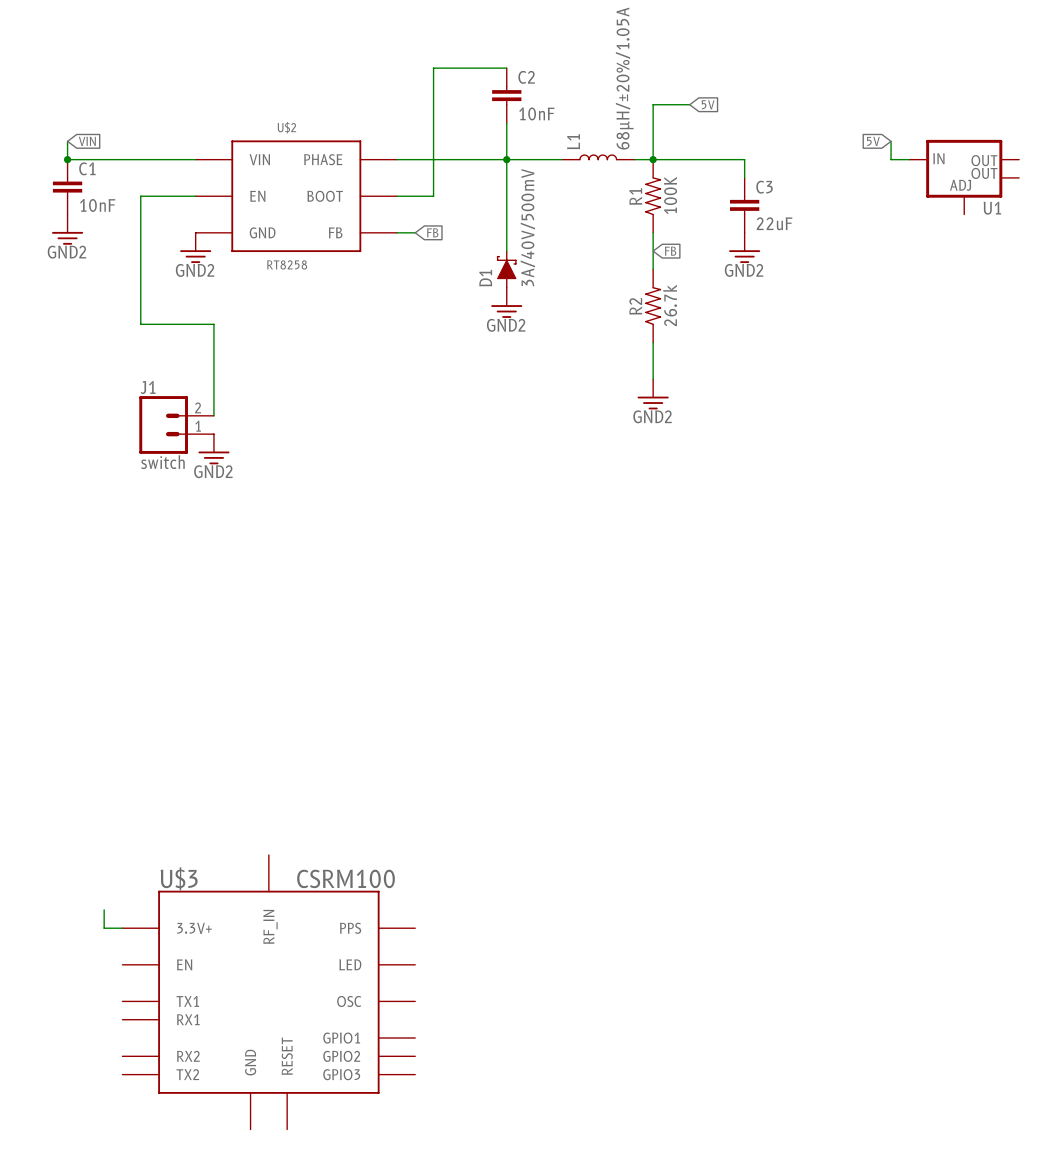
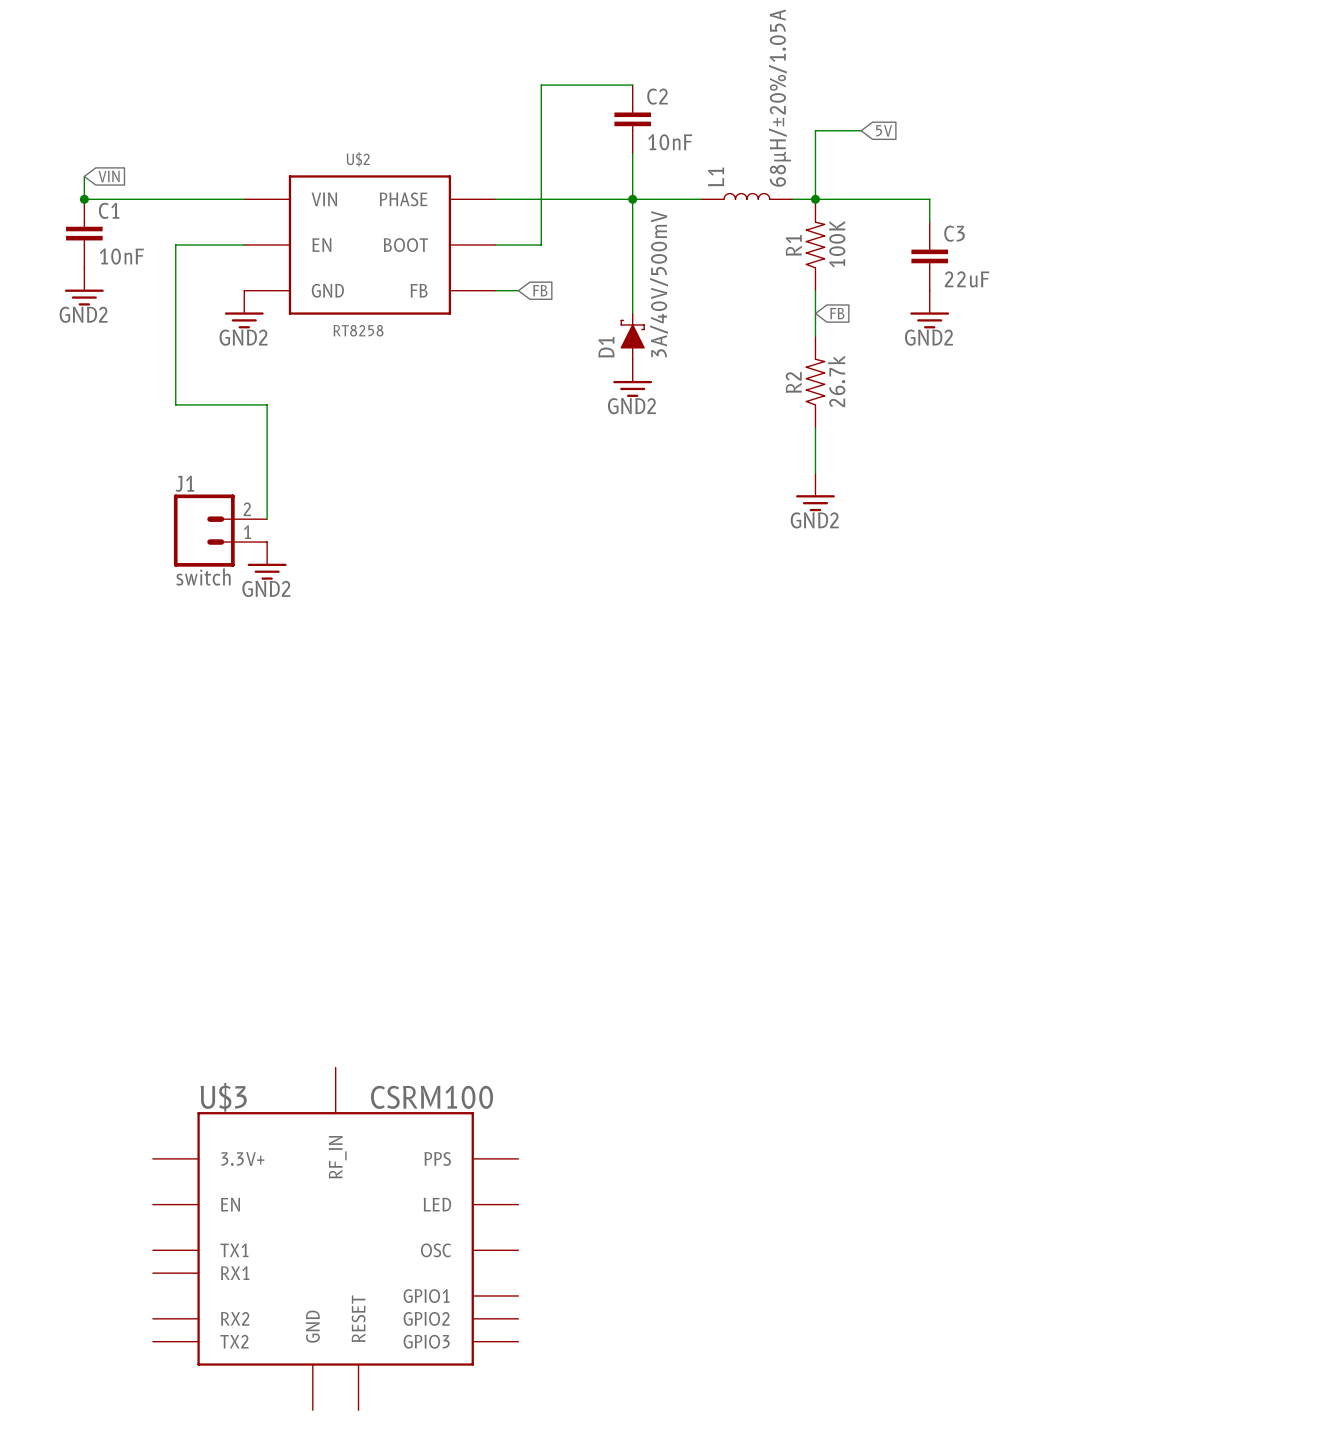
global label: 5V (873, 141) -> none
wire: (891, 141) (891, 159) (909, 159) -> none
U1: (964, 177) -> none
wire: (104, 909) (104, 928) (122, 928) -> none

